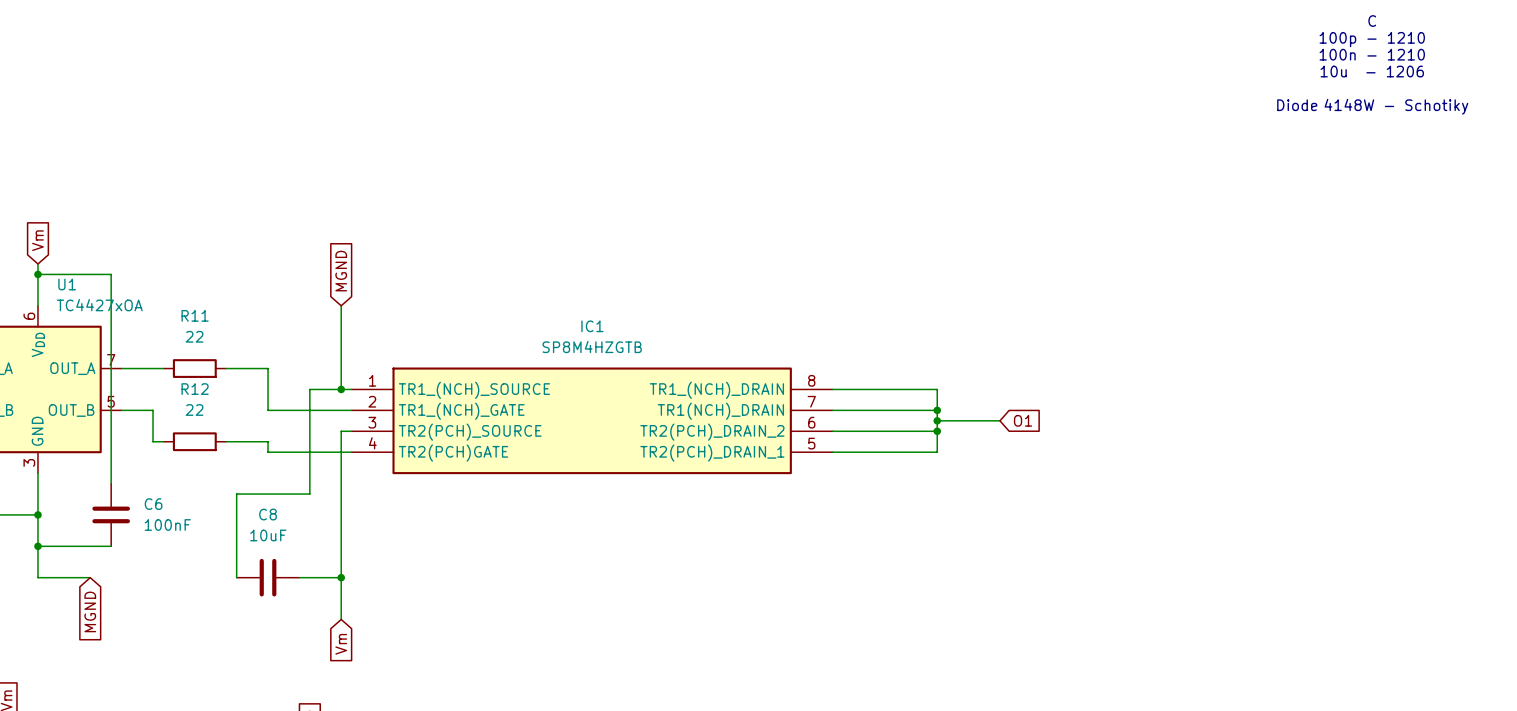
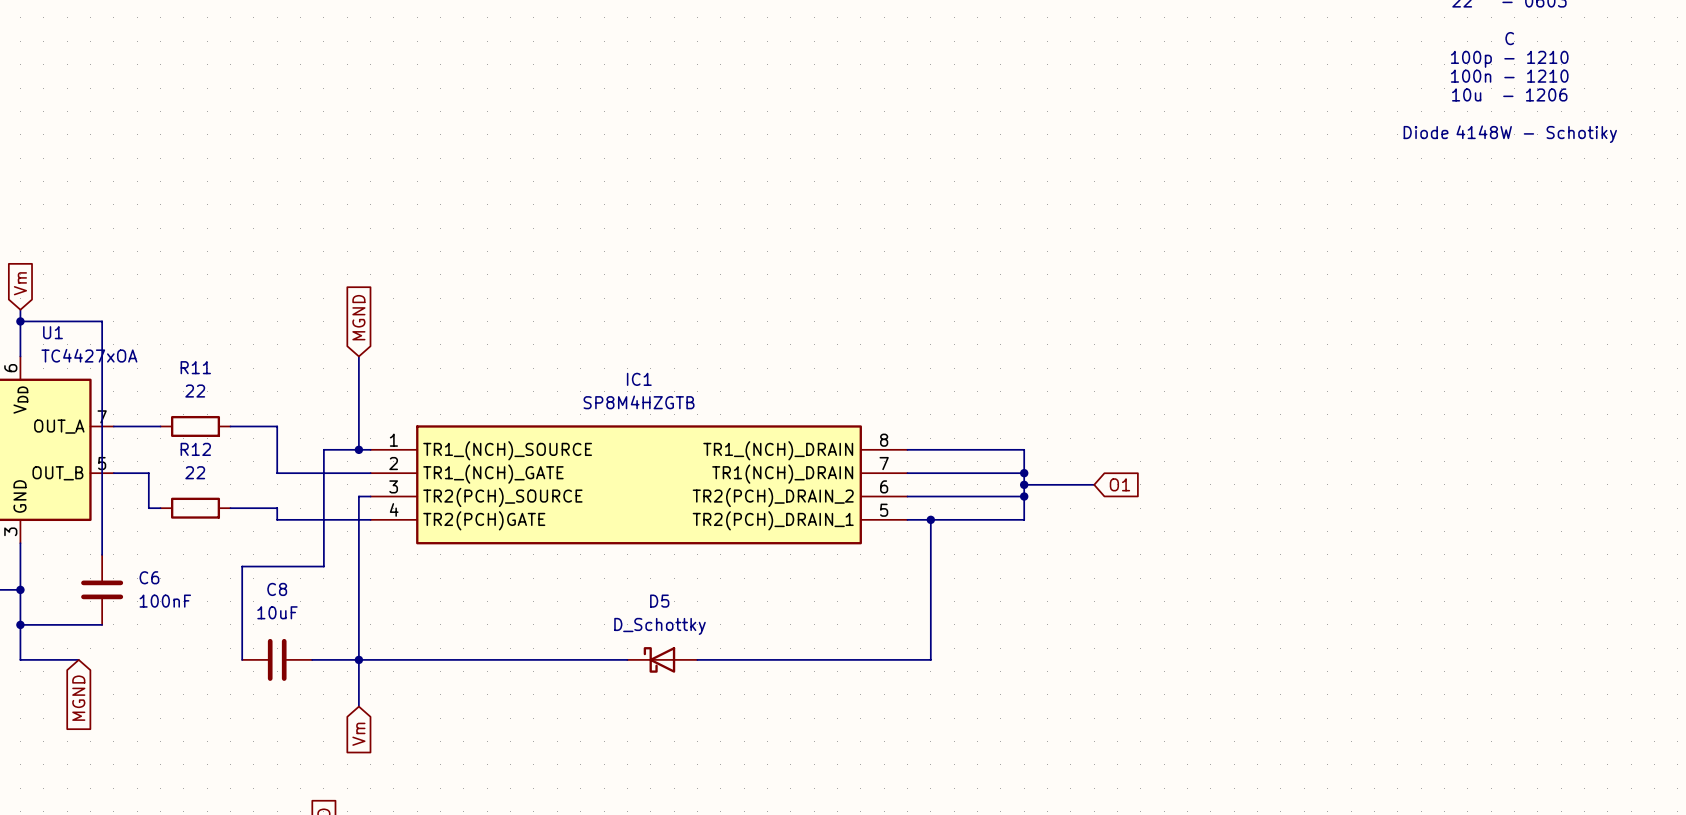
wire: none -> (930, 519) (930, 659) (697, 659)
junction: none -> (930, 519)
wire: none -> (358, 659) (627, 659)
D5: none -> D_Schottky (662, 659)

